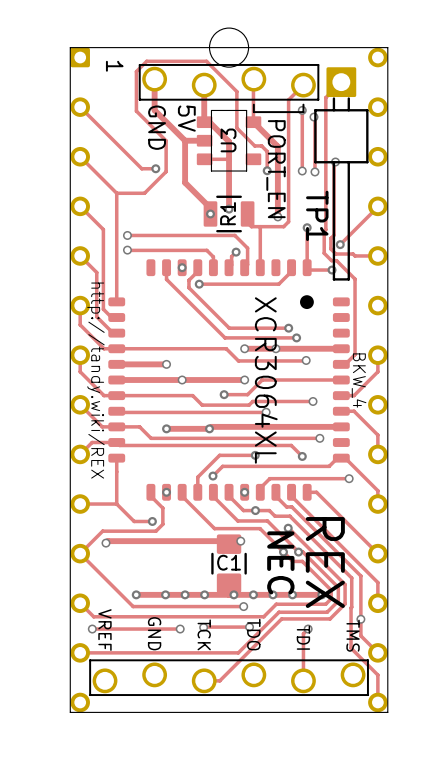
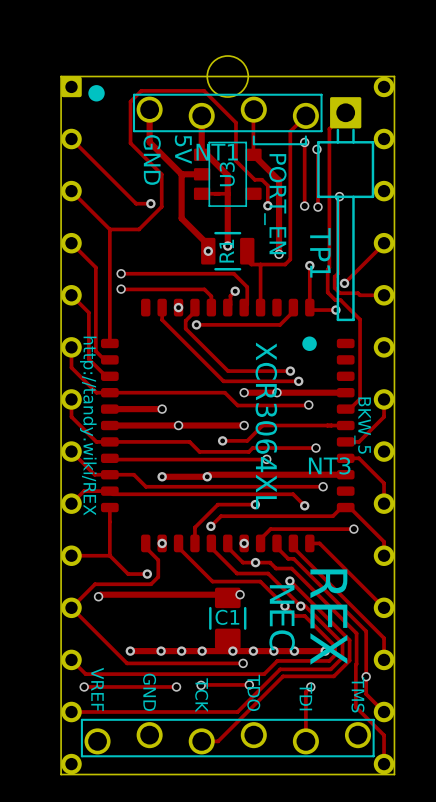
drawing: none -> [88, 85, 105, 102]
text: 1 (114, 66) -> none
NT1: none -> (217, 193)
NT3: none -> (329, 425)
text: BKW_4 (359, 380) -> BKW_5 (362, 425)

